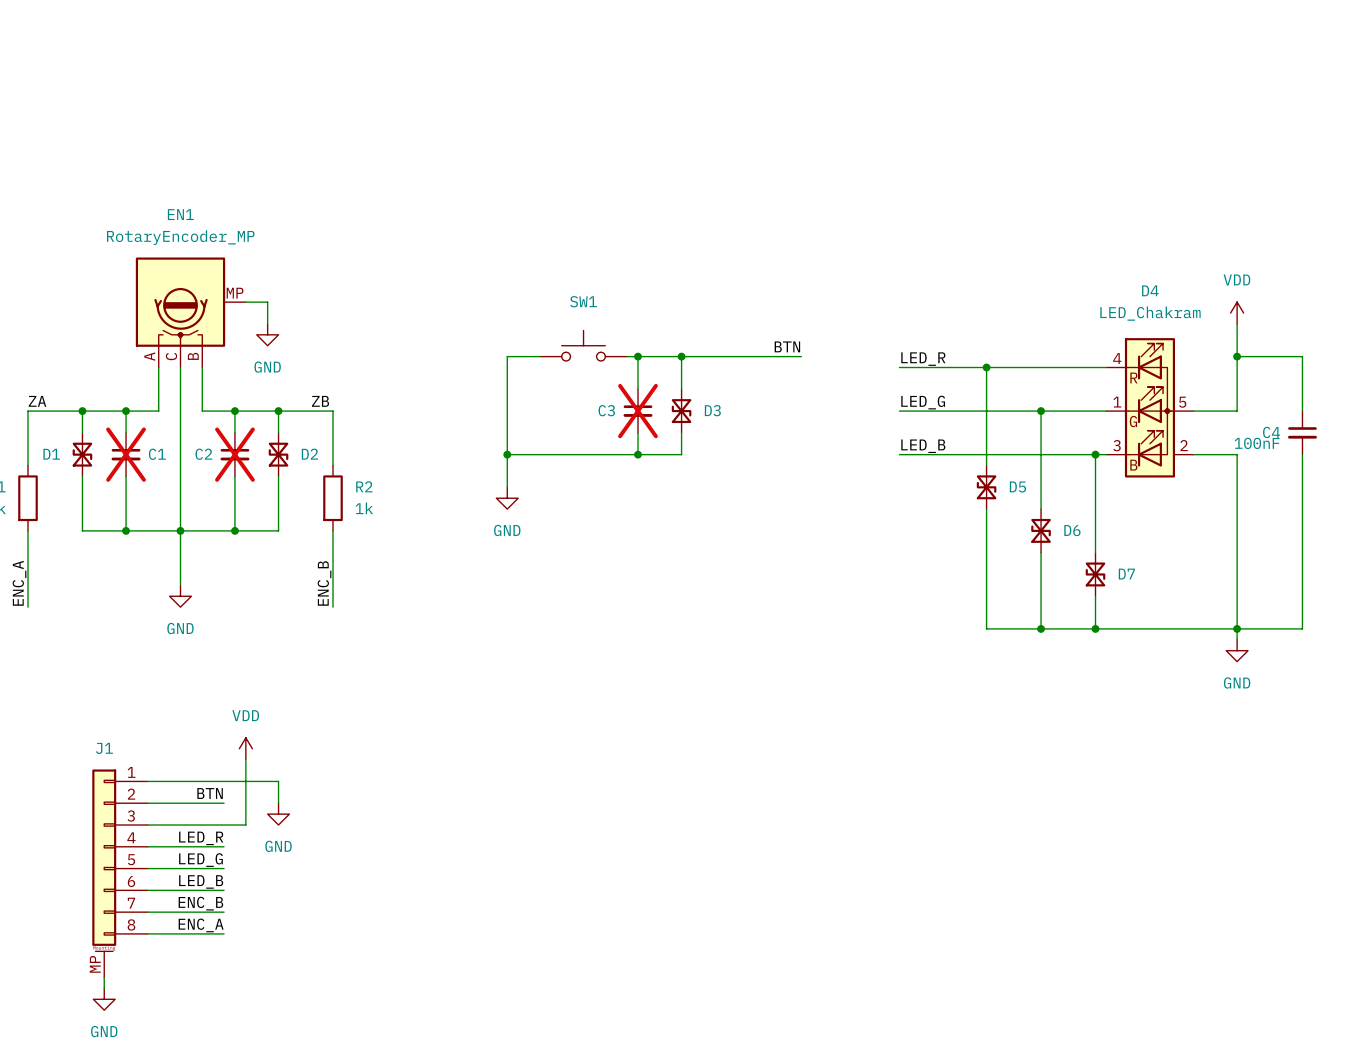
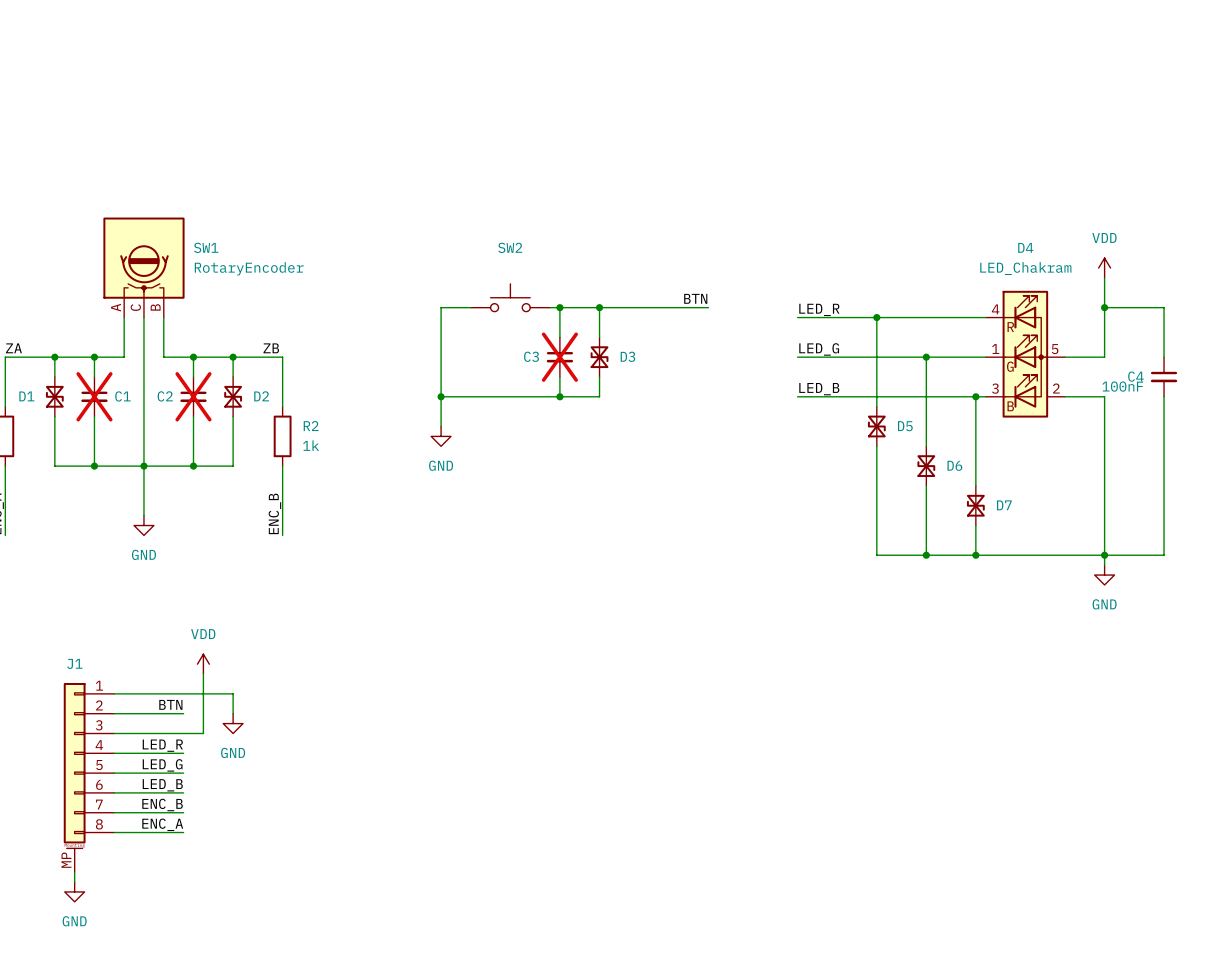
SW1 name: SW1 (583, 301) -> SW2 (510, 247)
wire: (245, 302) (267, 302) (267, 323) -> none
SW1: none -> RotaryEncoder (143, 267)
EN1: RotaryEncoder_MP (190, 312) -> none
power symbol: GND (267, 334) -> none

